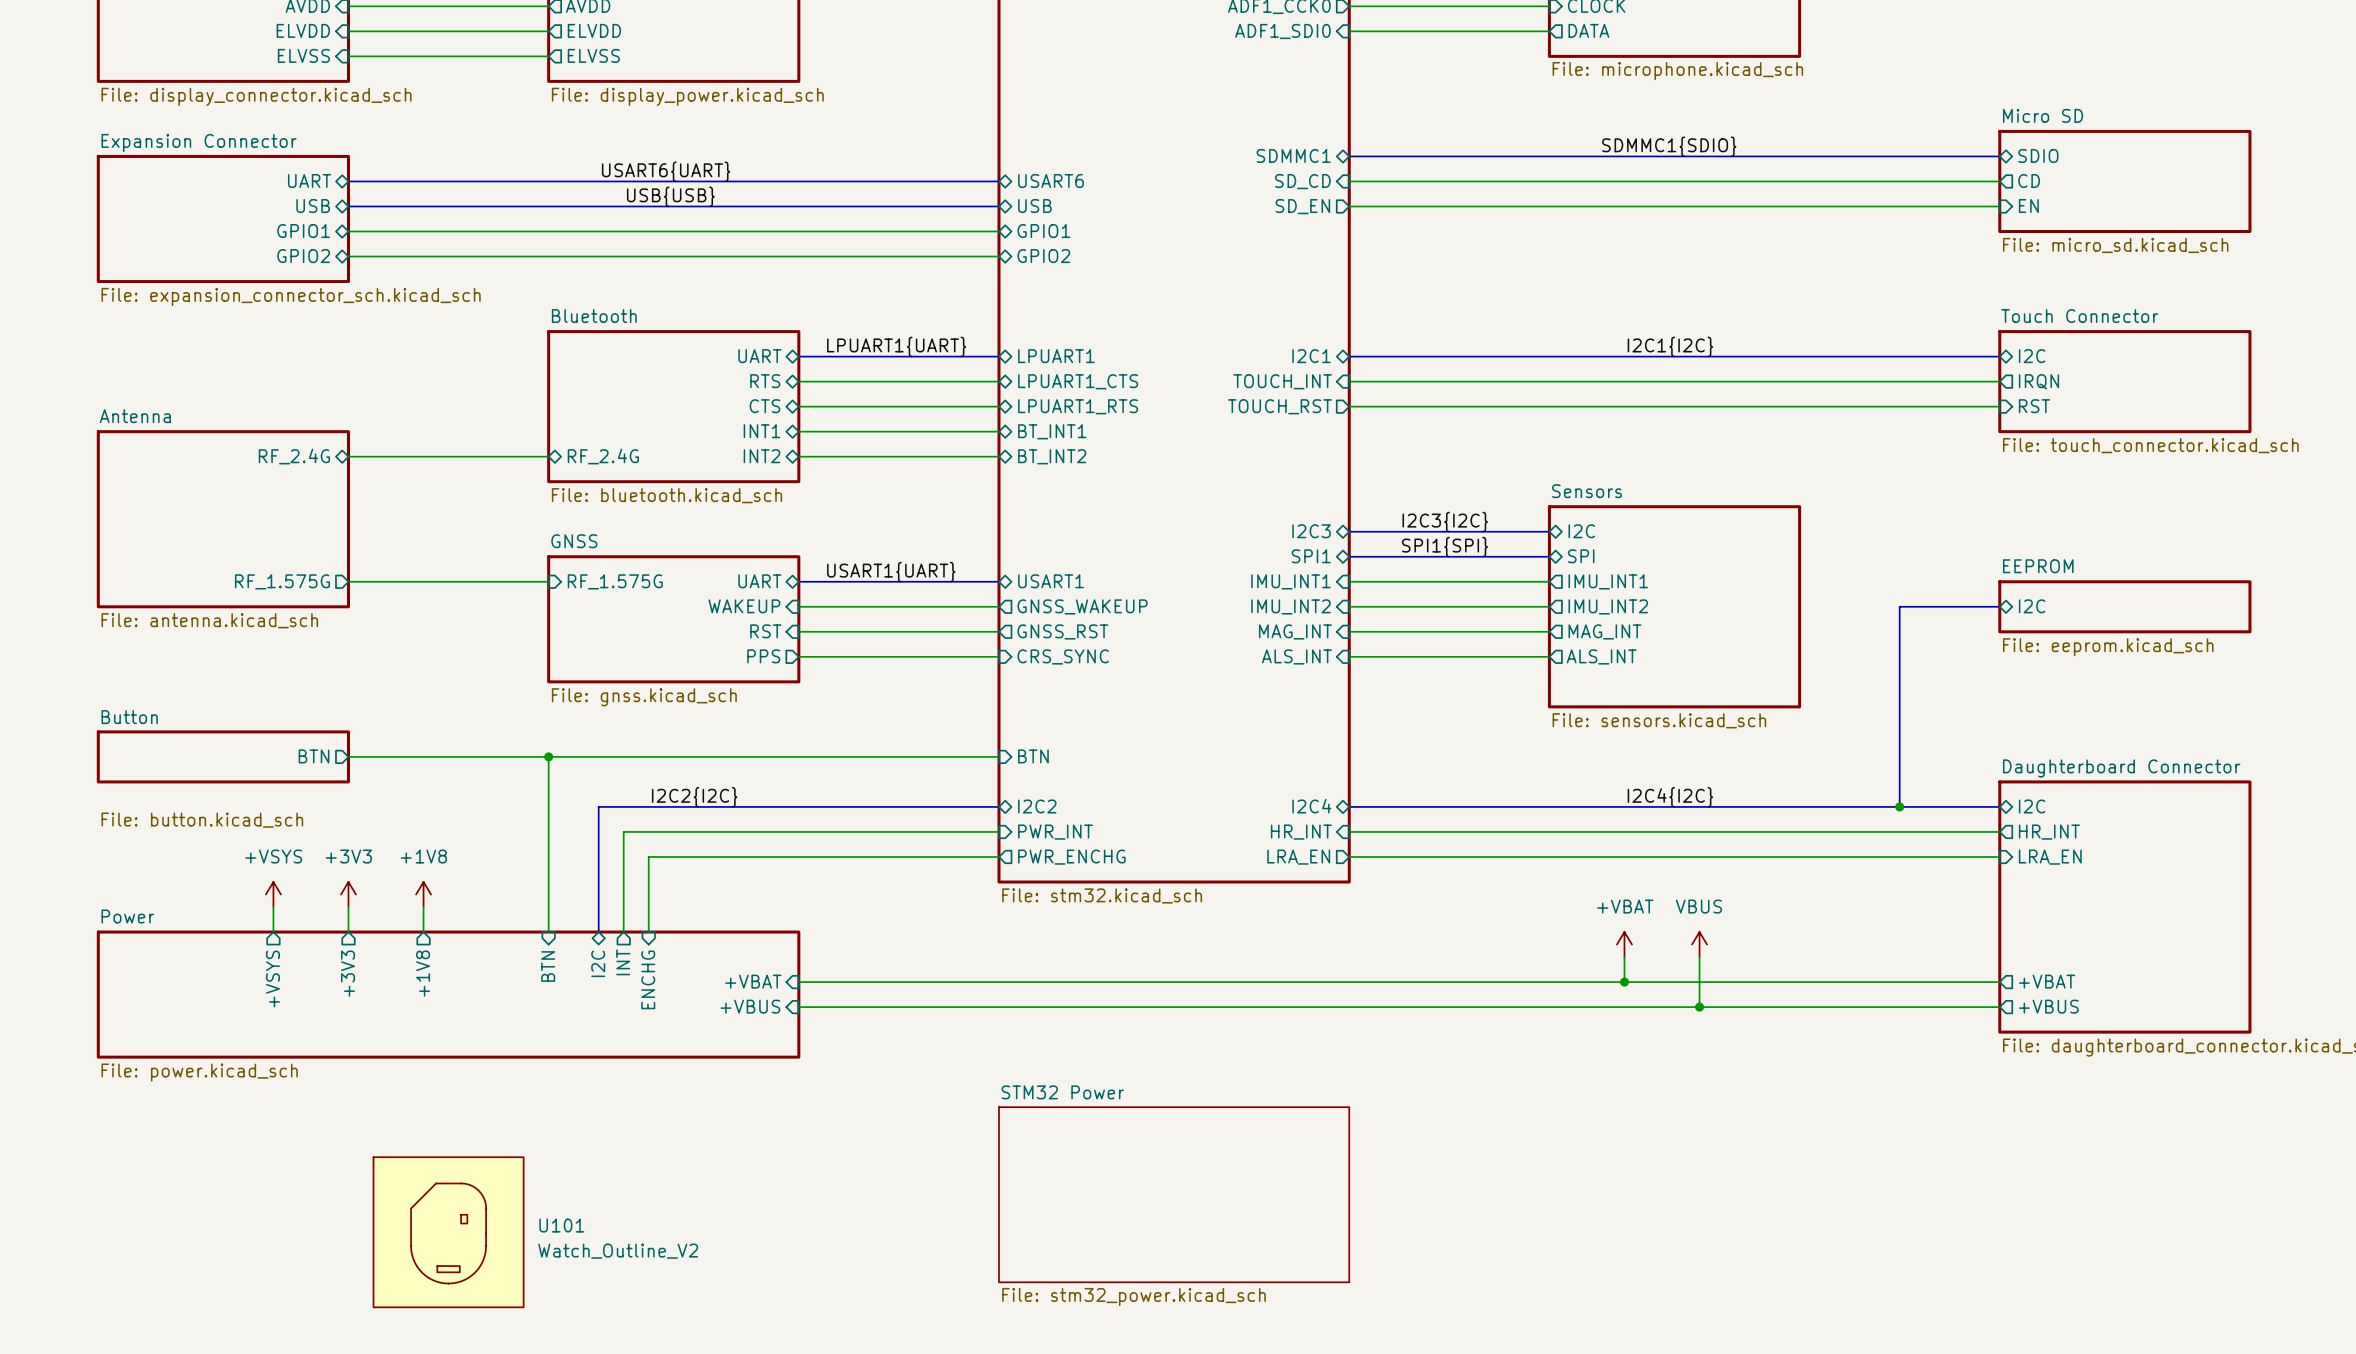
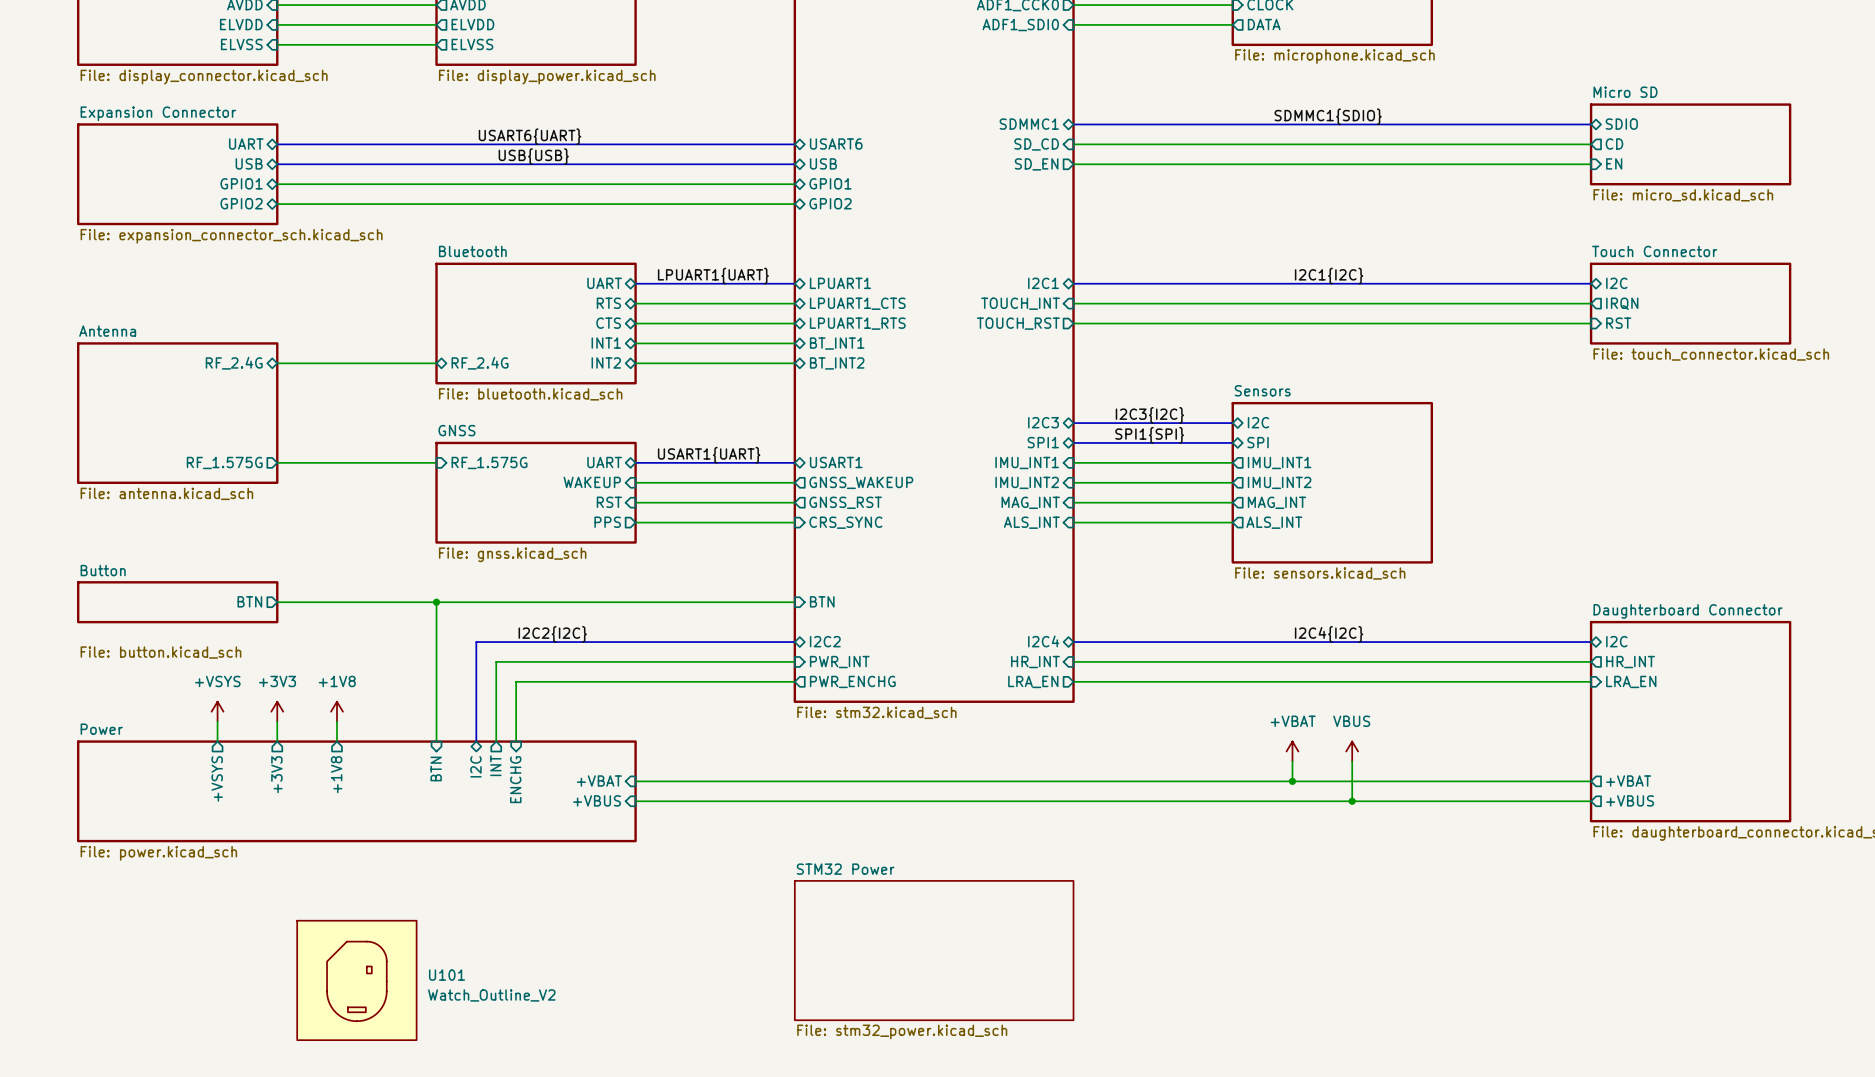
bus: (1999, 606) (1899, 606) (1899, 806) -> none
sheet pin: I2C (2032, 606) -> none
sheet EEPROM: File: eeprom.kicad_sch (2124, 606) -> none
junction: (1899, 806) -> none

